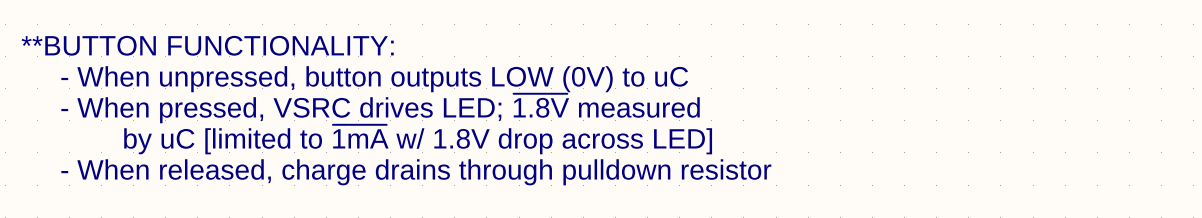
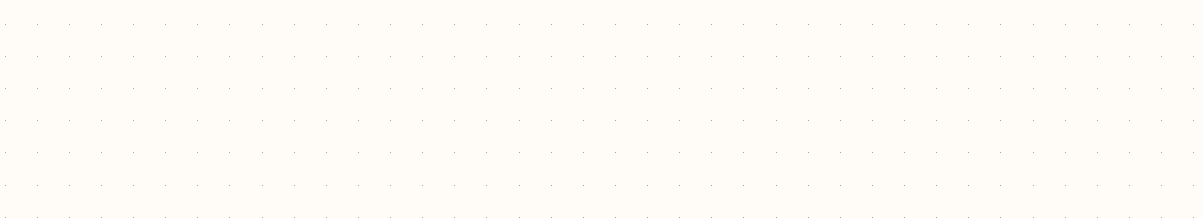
text: **BUTTON FUNCTIONALITY: (207, 45) -> none
text: - When unpressed, button outputs LOW (0V) to uC (374, 79) -> none
text: - When pressed, VSRC drives LED; ~{1.8V} measured (380, 108) -> none
text: by uC [limited to ~{1mA} w/ 1.8V drop across LED] (418, 139) -> none
text: - When released, charge drains through pulldown resistor (416, 172) -> none

